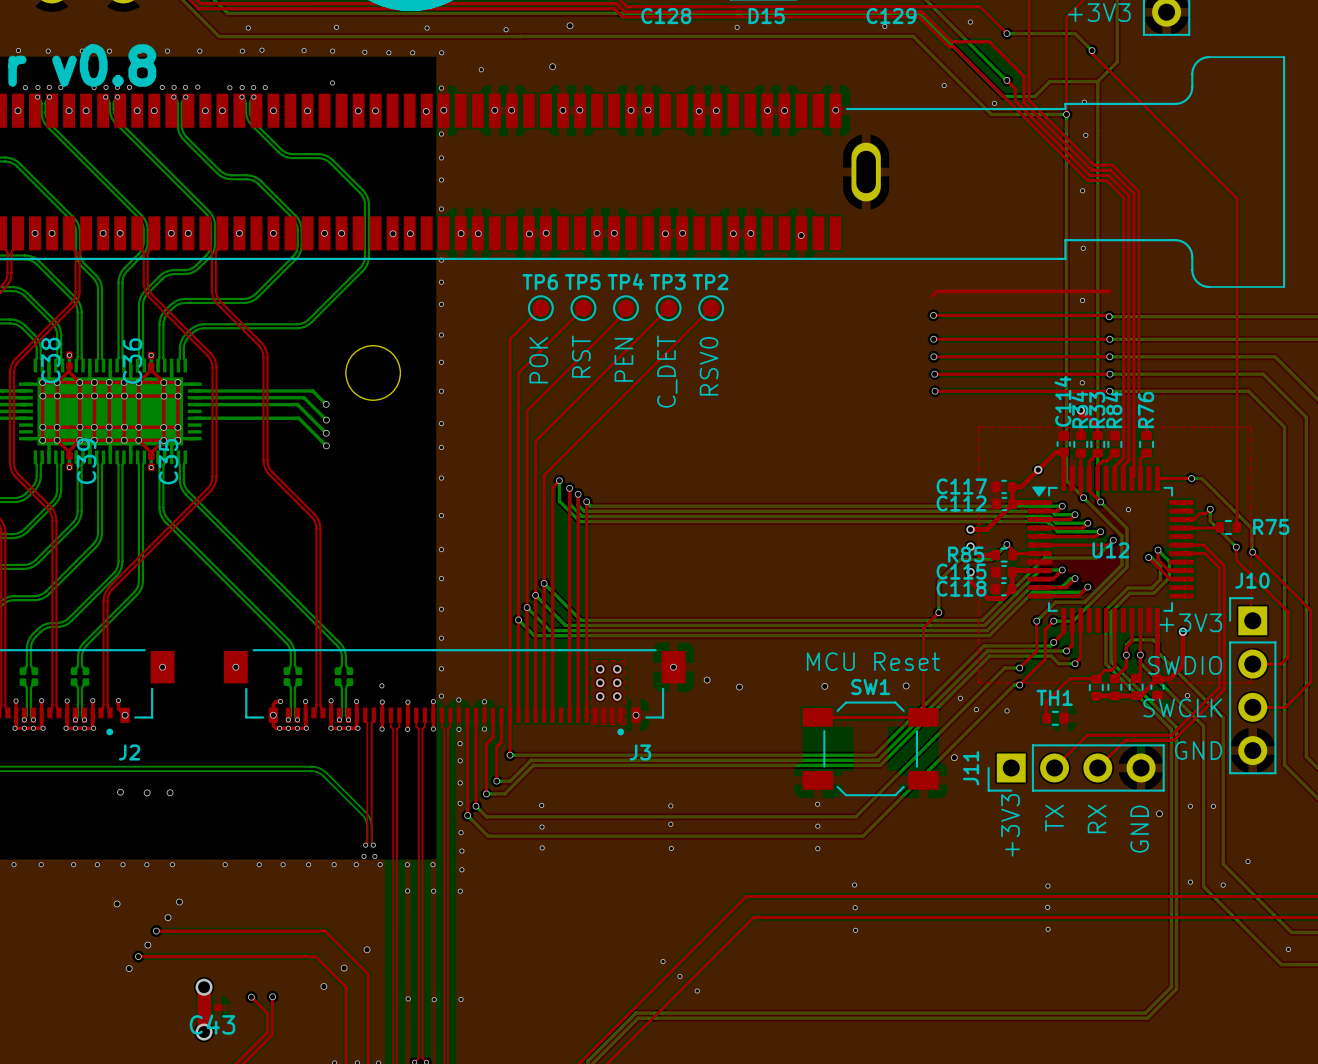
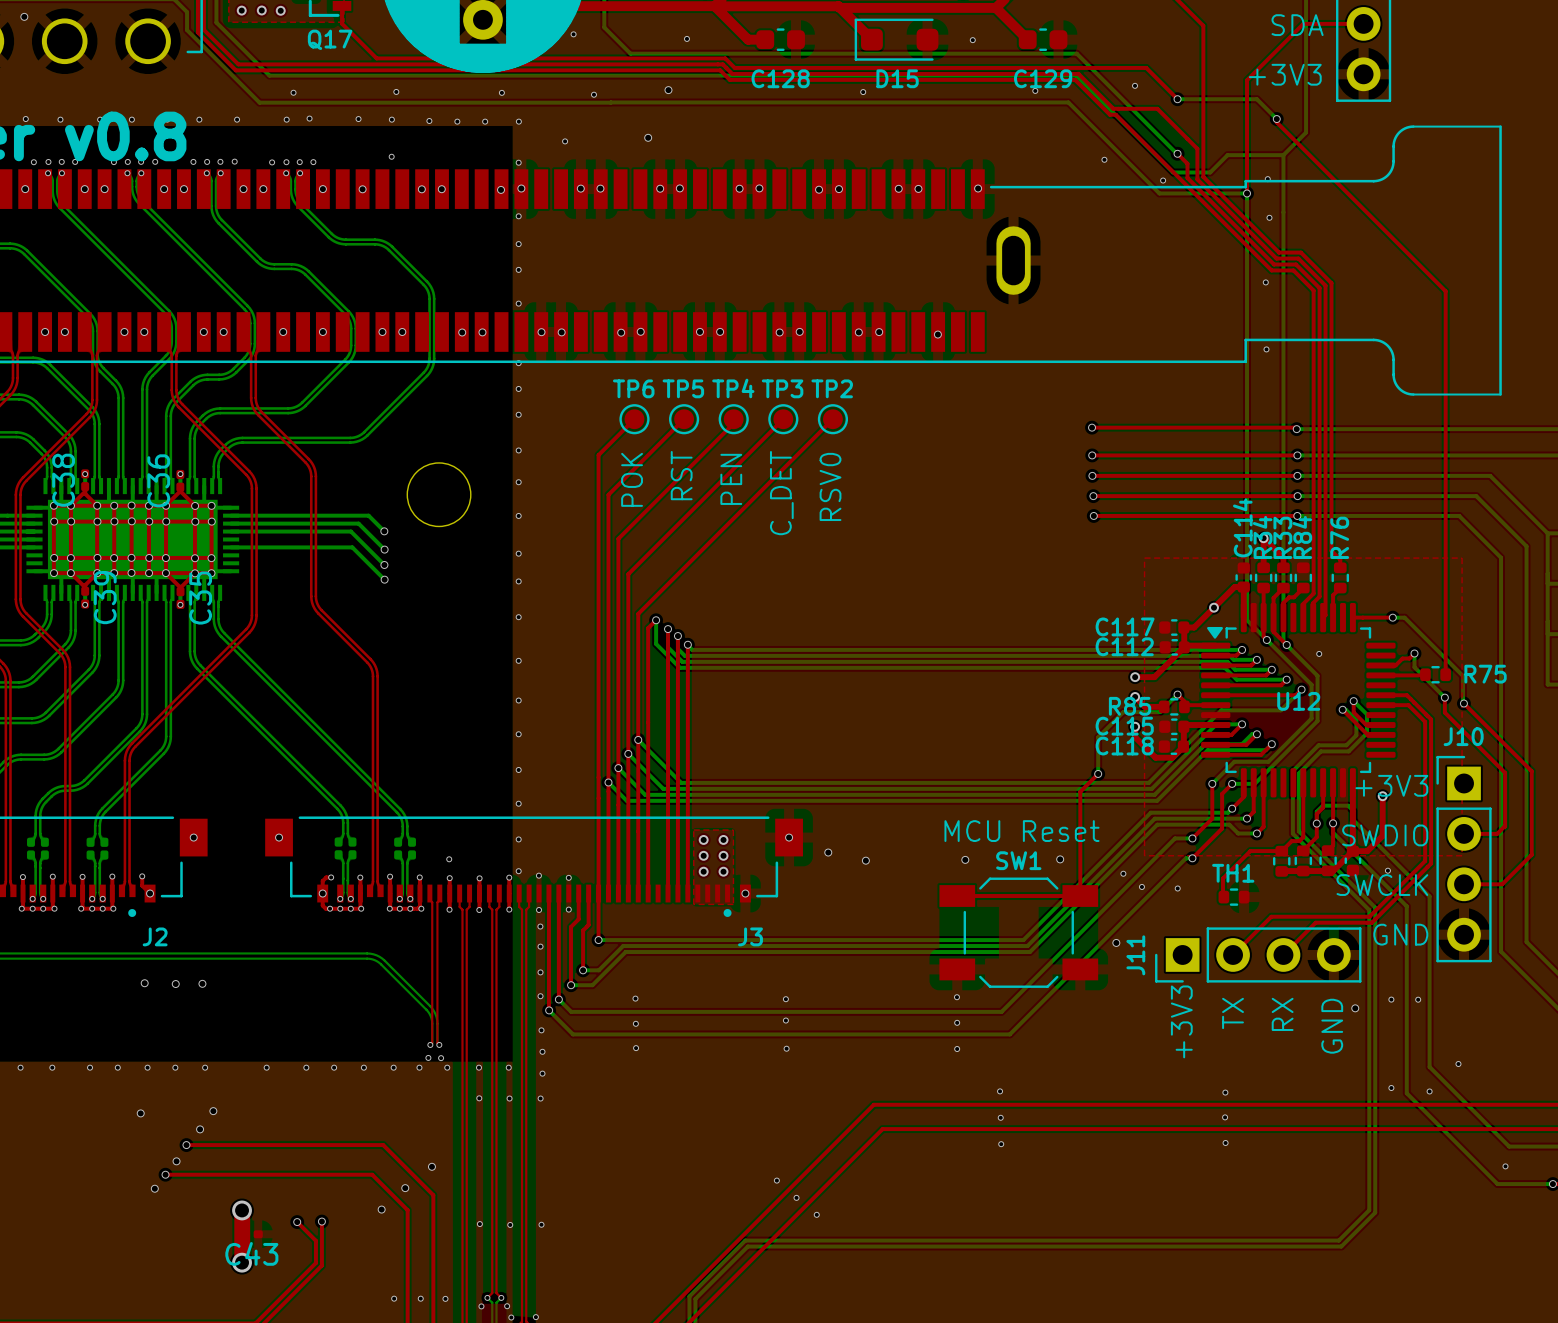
top track: (1109, 291) (937, 291) (932, 295) -> none
via: (1082, 300) -> none
via: (1082, 382) -> none

